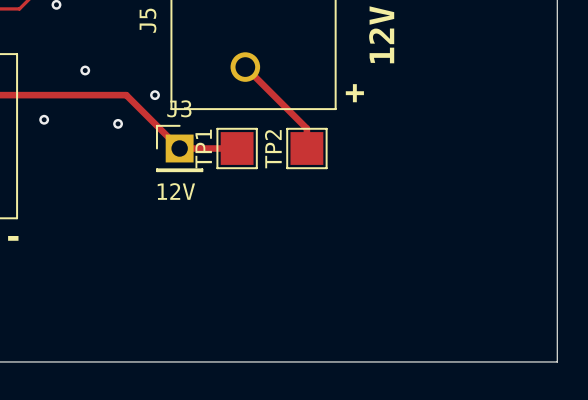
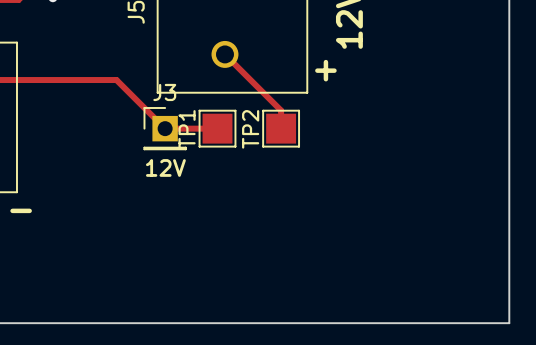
via: (85, 70) -> none
via: (155, 95) -> none
via: (44, 119) -> none
via: (118, 123) -> none

